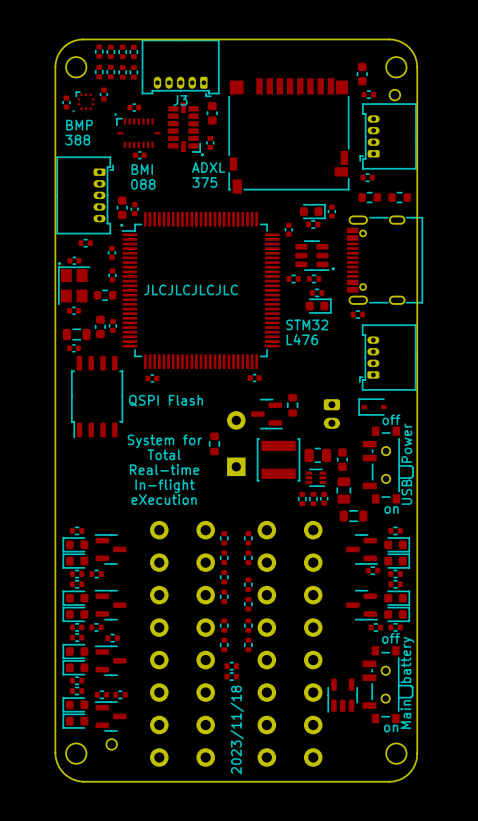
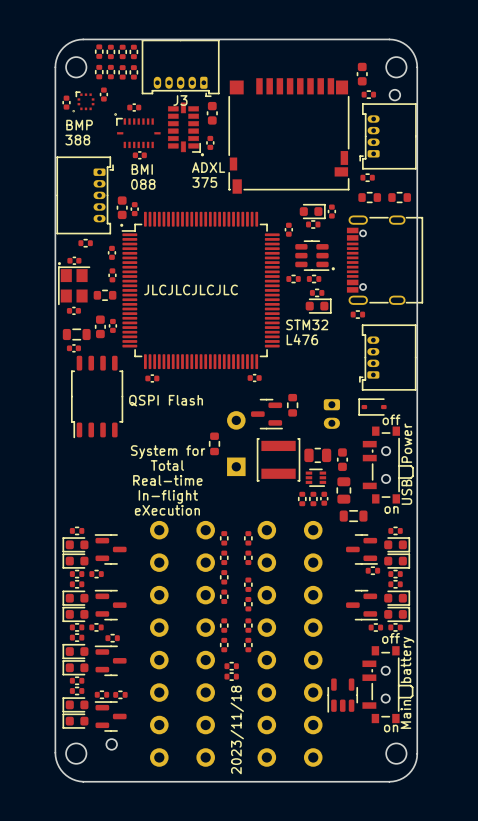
text: System for (164, 441) -> none
text: Total (164, 454) -> System for (168, 452)
text: Real-time (164, 469) -> Total (167, 465)
text: In-flight (165, 486) -> Real-time (167, 480)
text: eXecution (164, 499) -> In-flight (168, 496)
text: none -> eXecution (167, 510)

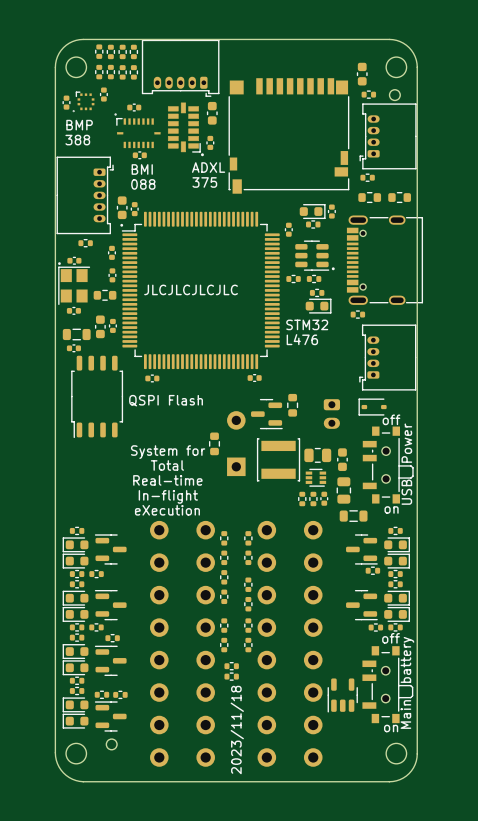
J3 name: J3 (180, 100) -> none

